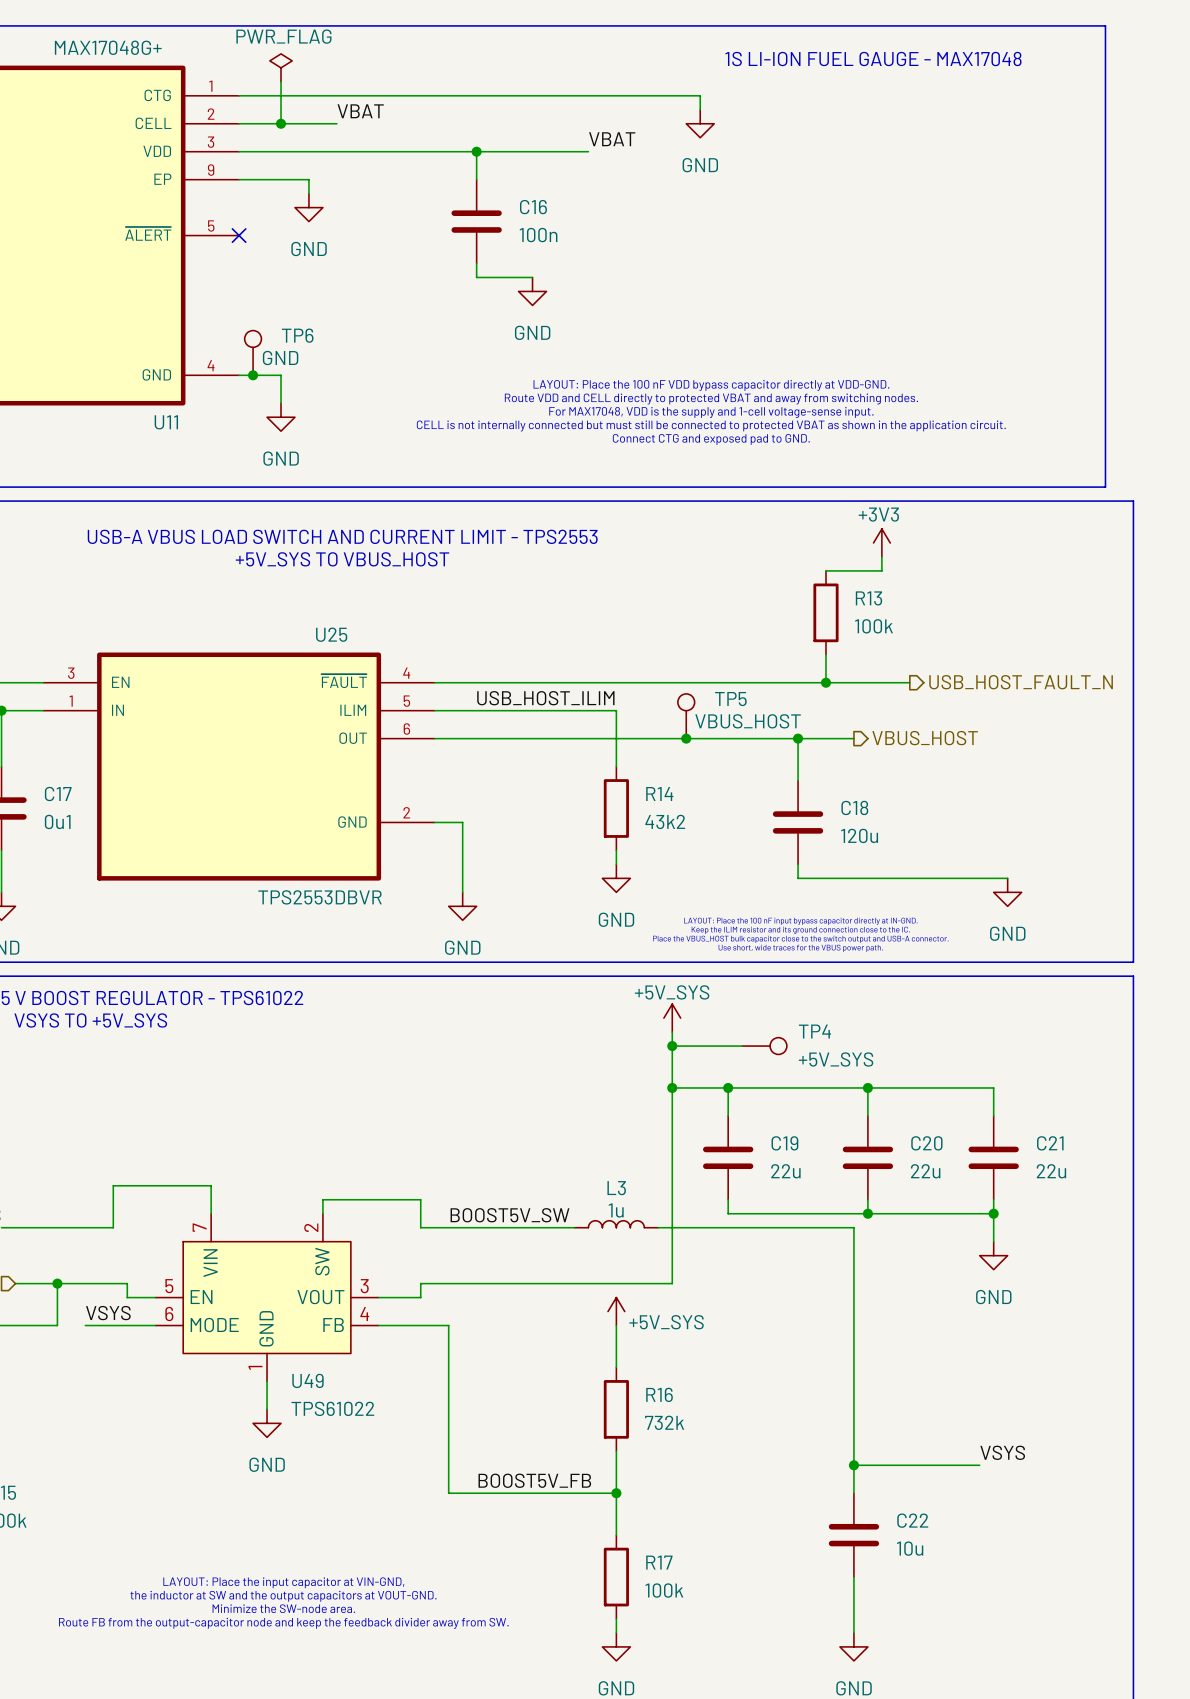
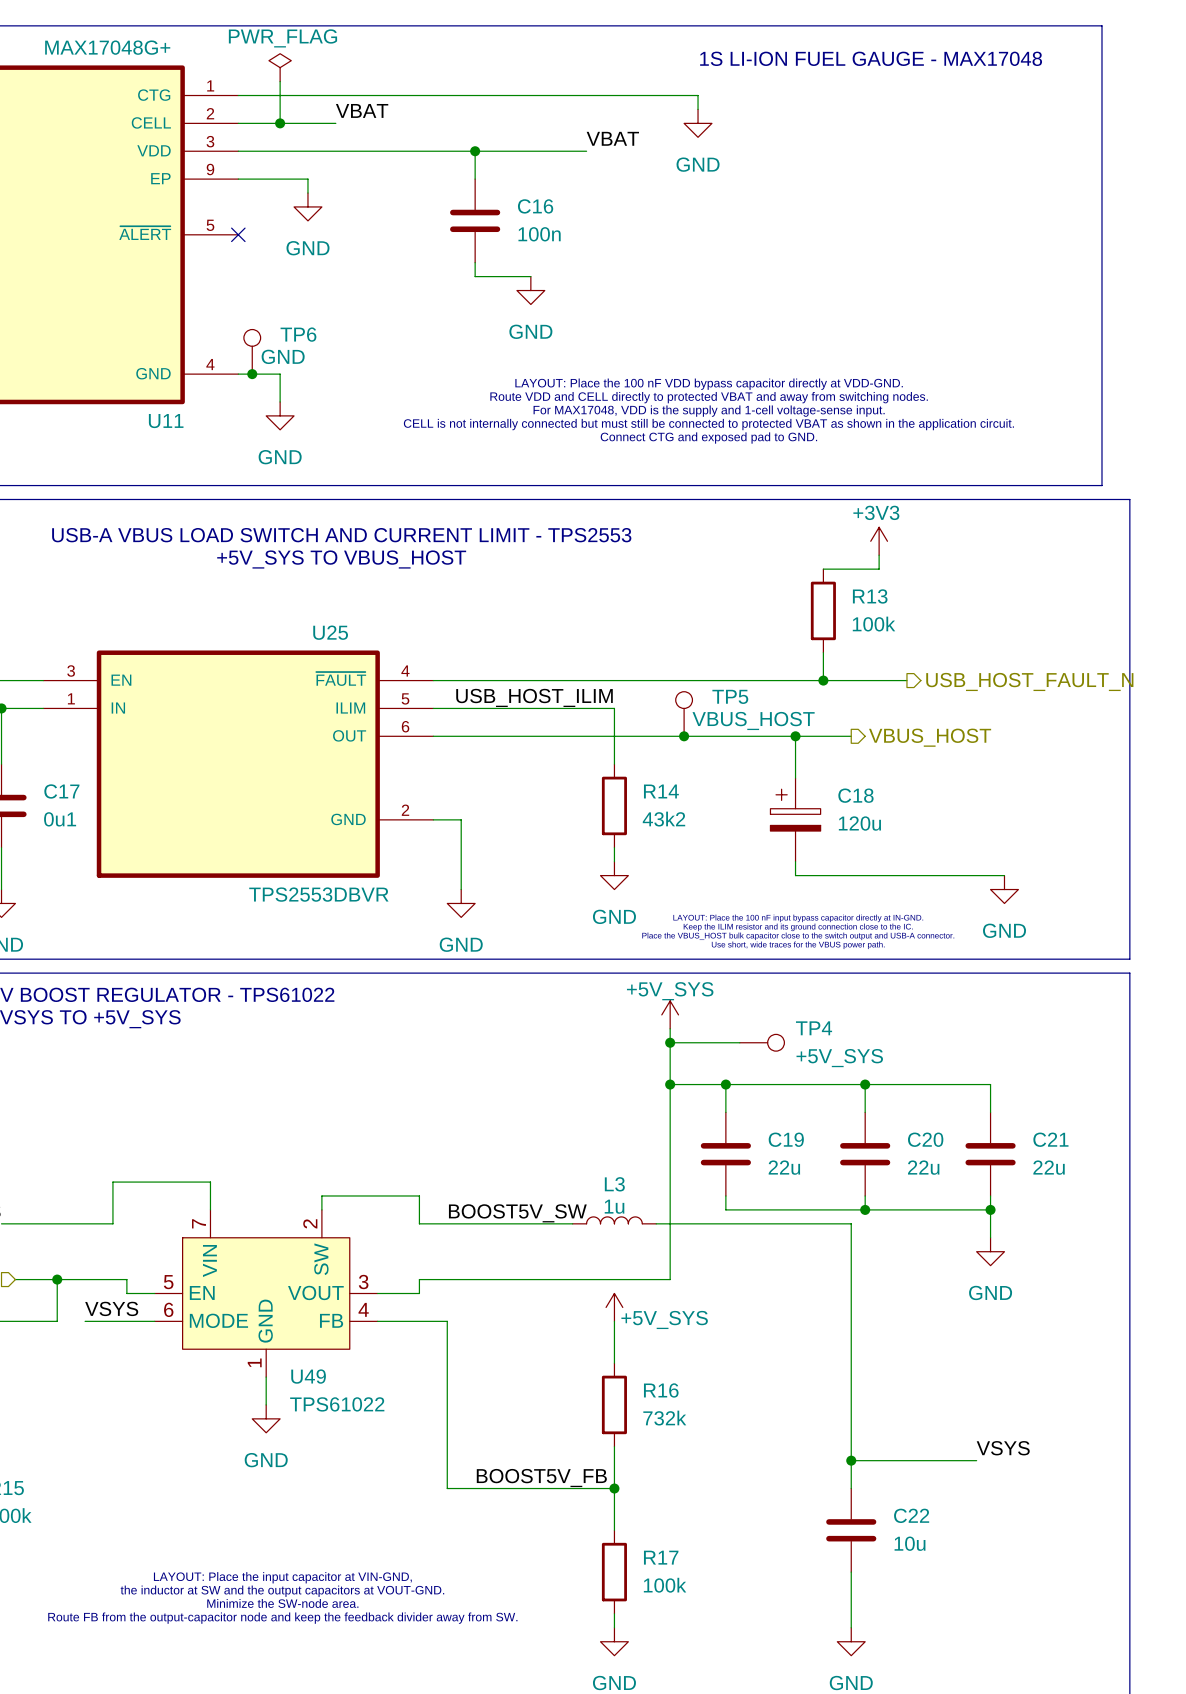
C18 symbol: [772, 780, 824, 865] -> [770, 778, 821, 862]

